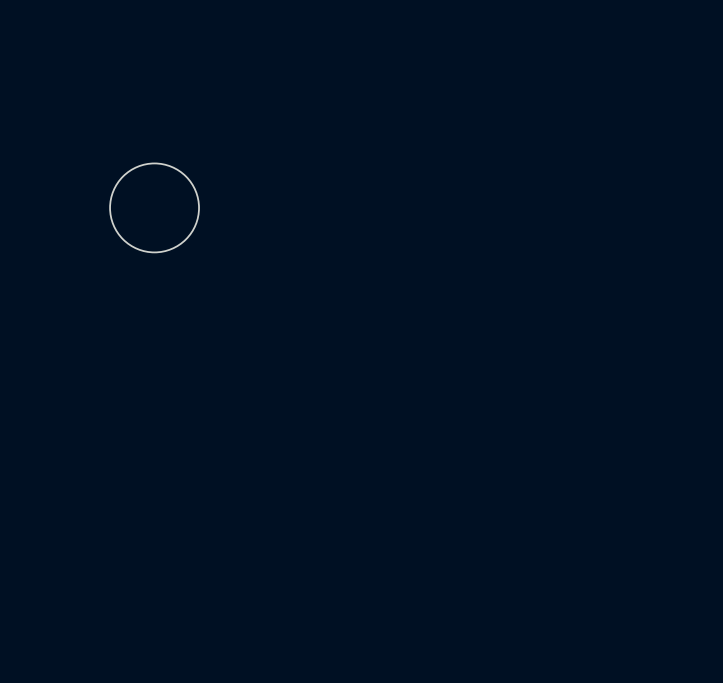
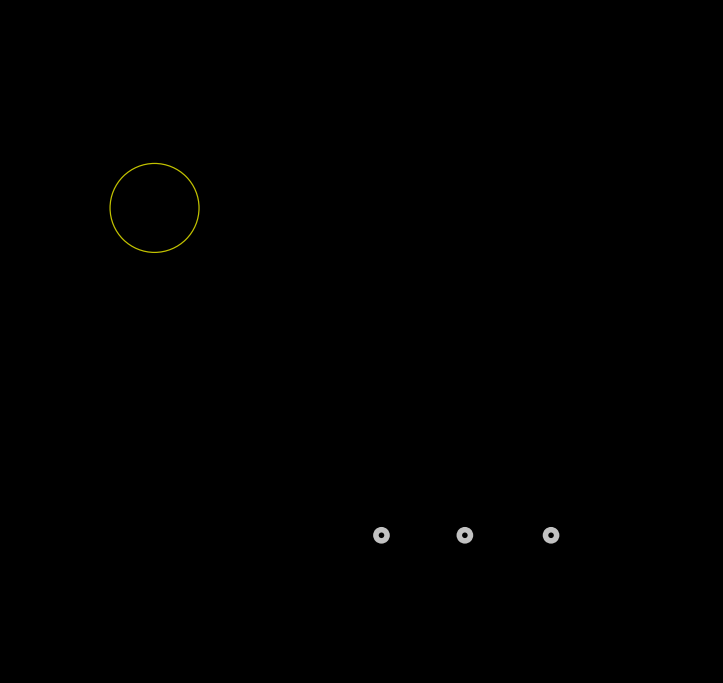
via: none -> (381, 535)
via: none -> (464, 535)
via: none -> (551, 535)

